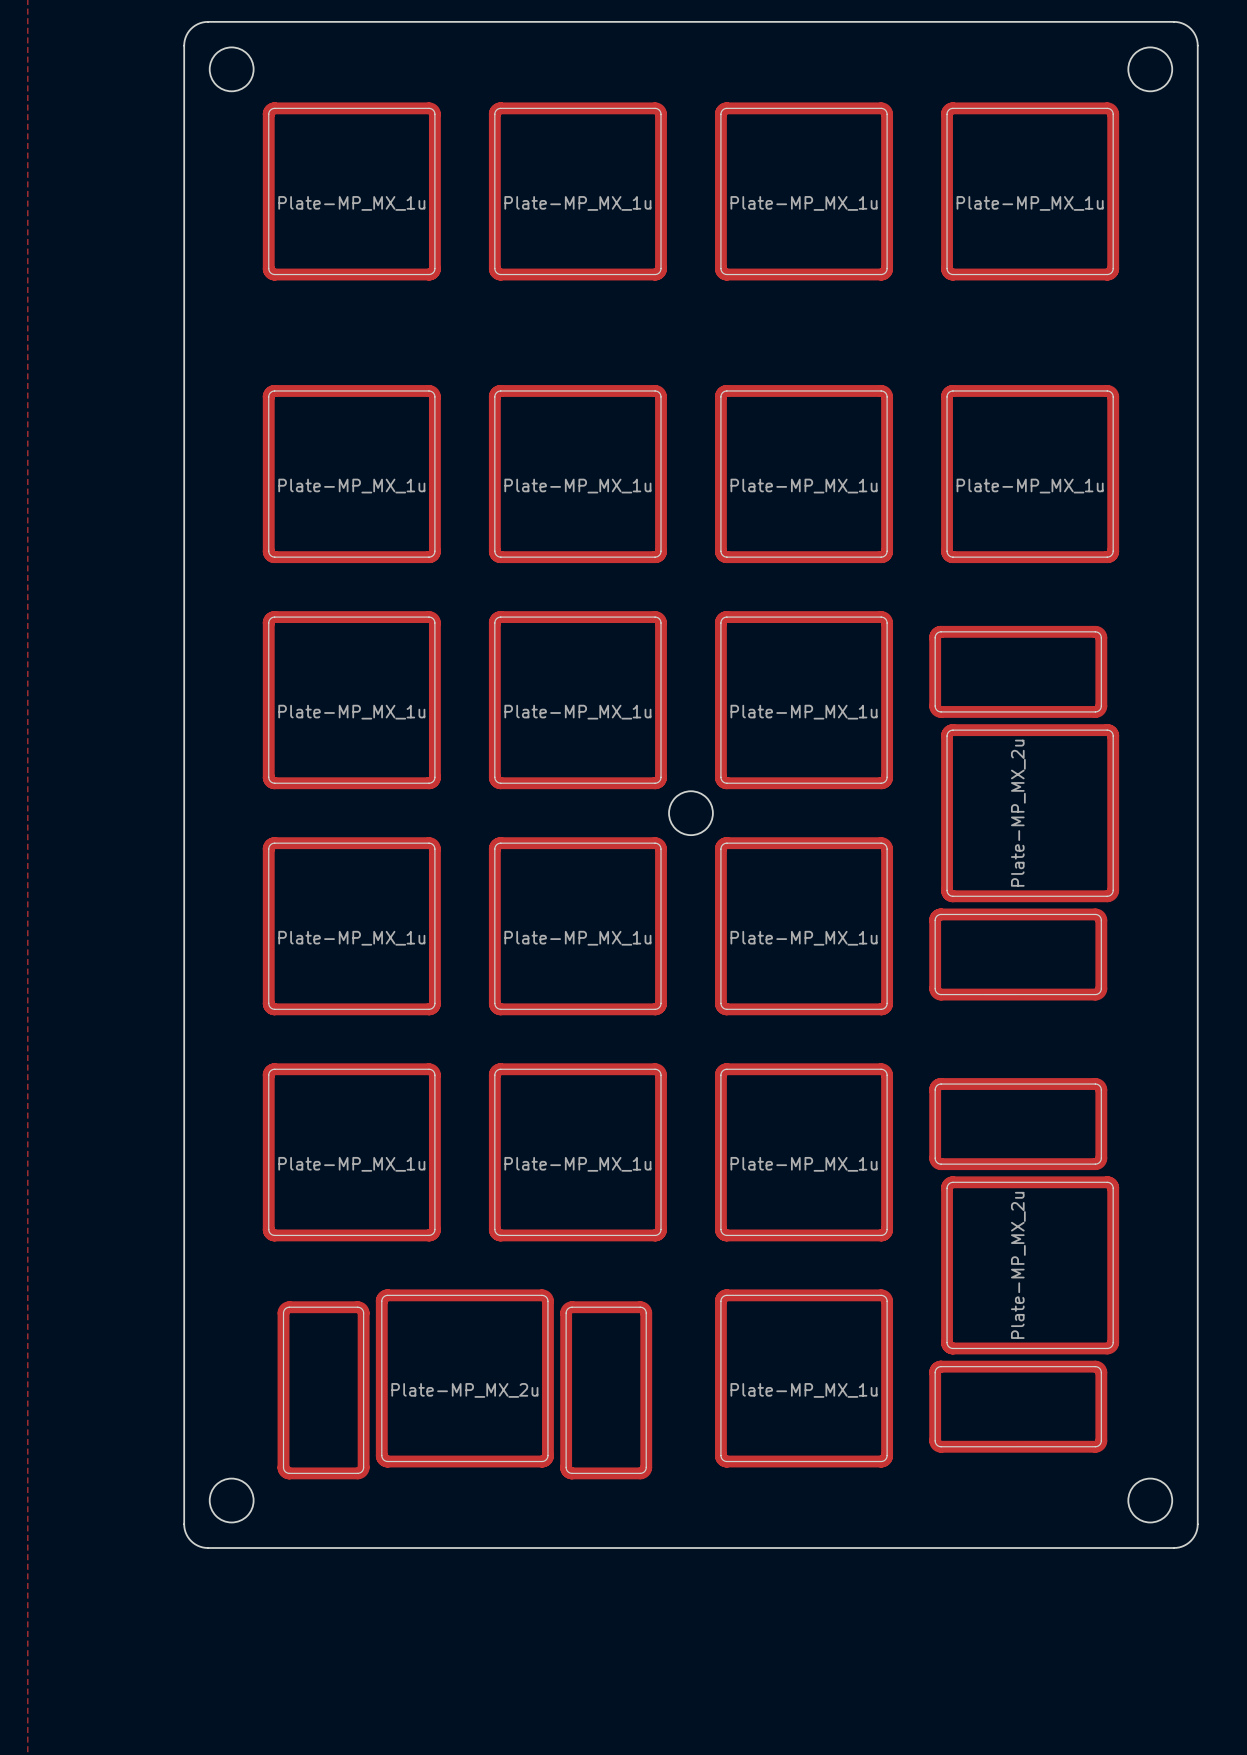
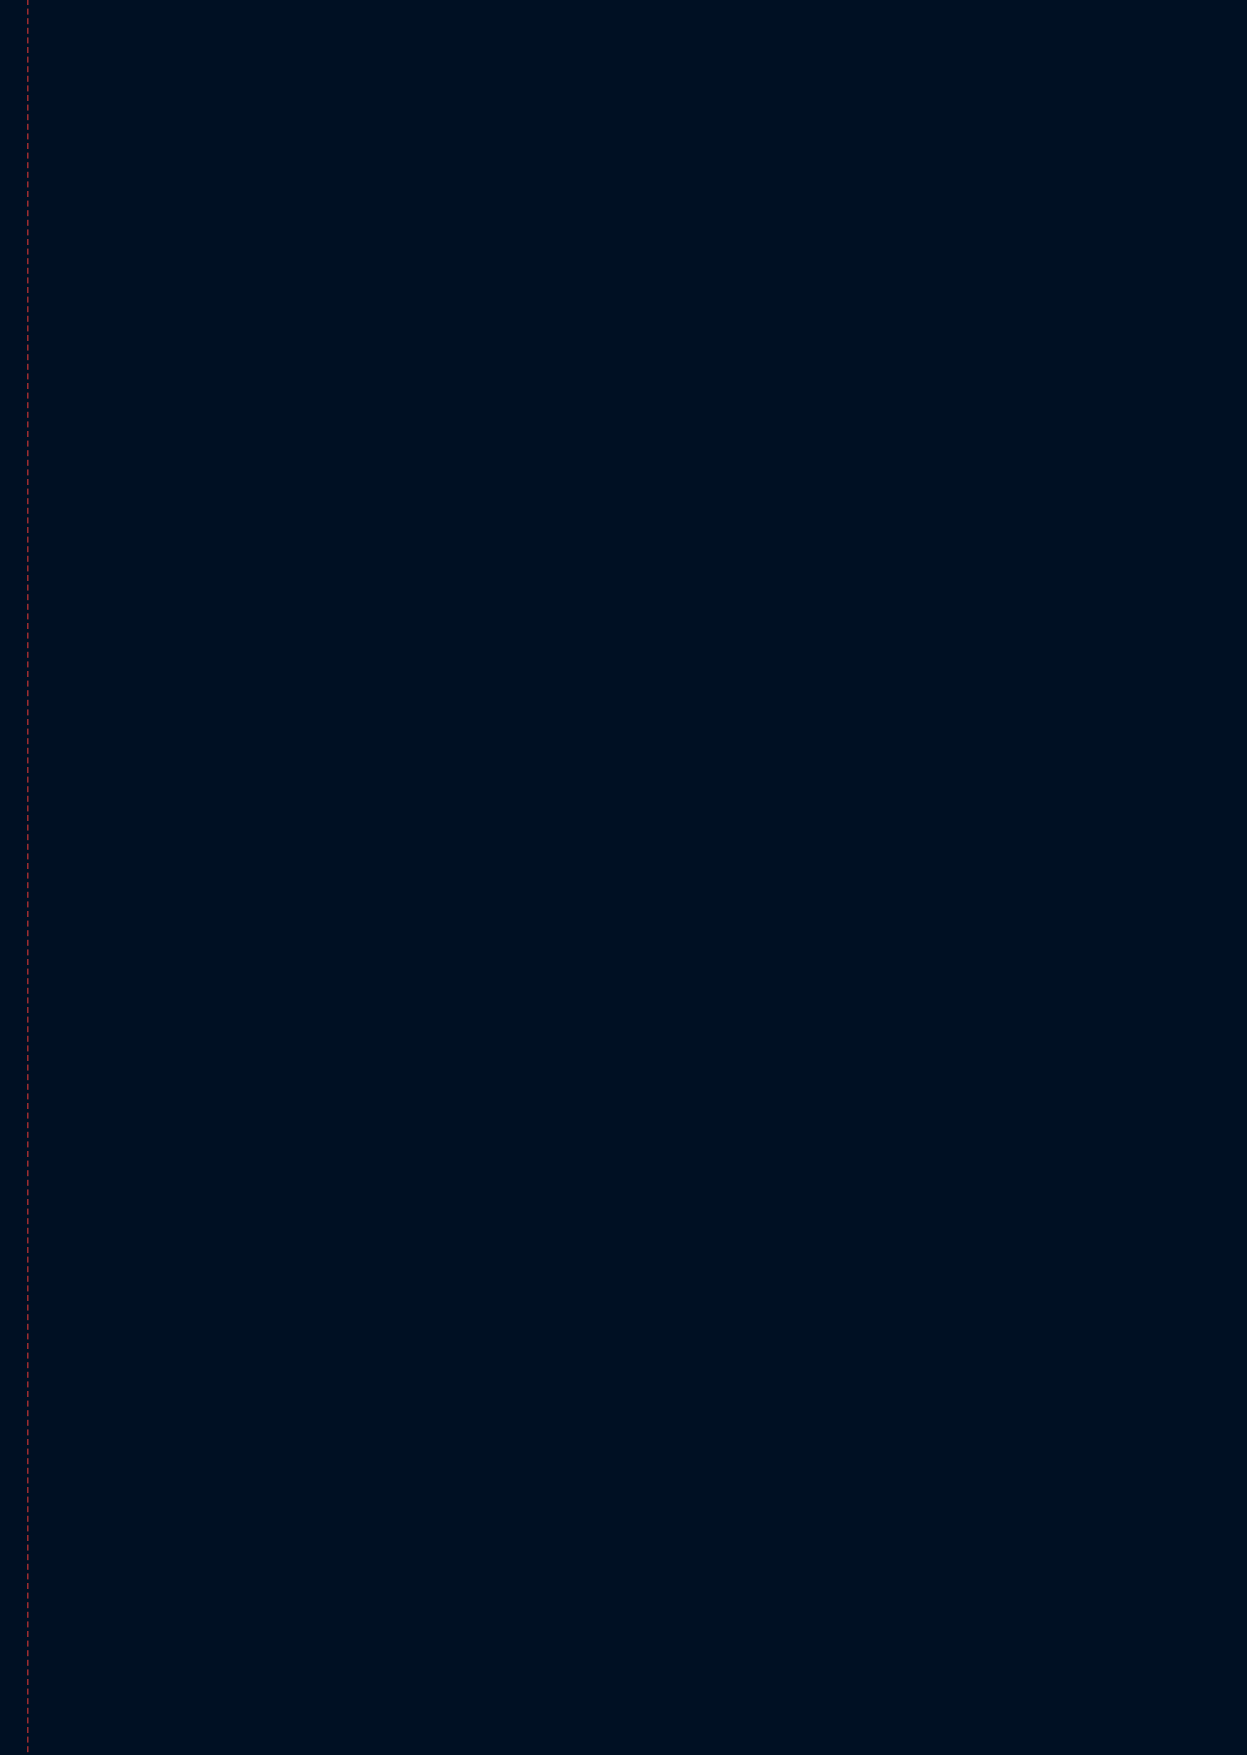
board edge: (207, 21) (1174, 21) (1186, 25) (1194, 32) (1197, 45) (1197, 1524) (1195, 1534) (1186, 1544) (1174, 1548) (207, 1548) (195, 1544) (187, 1536) (184, 1524) (184, 45) (186, 35) (191, 28) (200, 23) (207, 21) -> none
round board edge: [208, 46, 255, 93] -> none
round board edge: [1127, 46, 1174, 93] -> none
drawing: [262, 102, 441, 281] -> none
drawing: [488, 102, 667, 281] -> none
drawing: [715, 102, 894, 281] -> none
drawing: [941, 102, 1120, 281] -> none
drawing: [262, 385, 441, 564] -> none
drawing: [488, 385, 667, 564] -> none
drawing: [715, 385, 894, 564] -> none
drawing: [941, 385, 1120, 564] -> none
drawing: [262, 611, 441, 790] -> none
drawing: [488, 611, 667, 790] -> none
drawing: [715, 611, 894, 790] -> none
drawing: [929, 625, 1120, 1001] -> none
round board edge: [668, 790, 714, 837] -> none
drawing: [262, 837, 441, 1016] -> none
drawing: [488, 837, 667, 1016] -> none
drawing: [715, 837, 894, 1016] -> none
drawing: [262, 1063, 441, 1242] -> none
drawing: [488, 1063, 667, 1242] -> none
drawing: [715, 1063, 894, 1242] -> none
drawing: [929, 1078, 1120, 1453] -> none
drawing: [277, 1289, 653, 1480] -> none
drawing: [715, 1289, 894, 1468] -> none
round board edge: [208, 1477, 255, 1524] -> none
round board edge: [1127, 1477, 1174, 1524] -> none

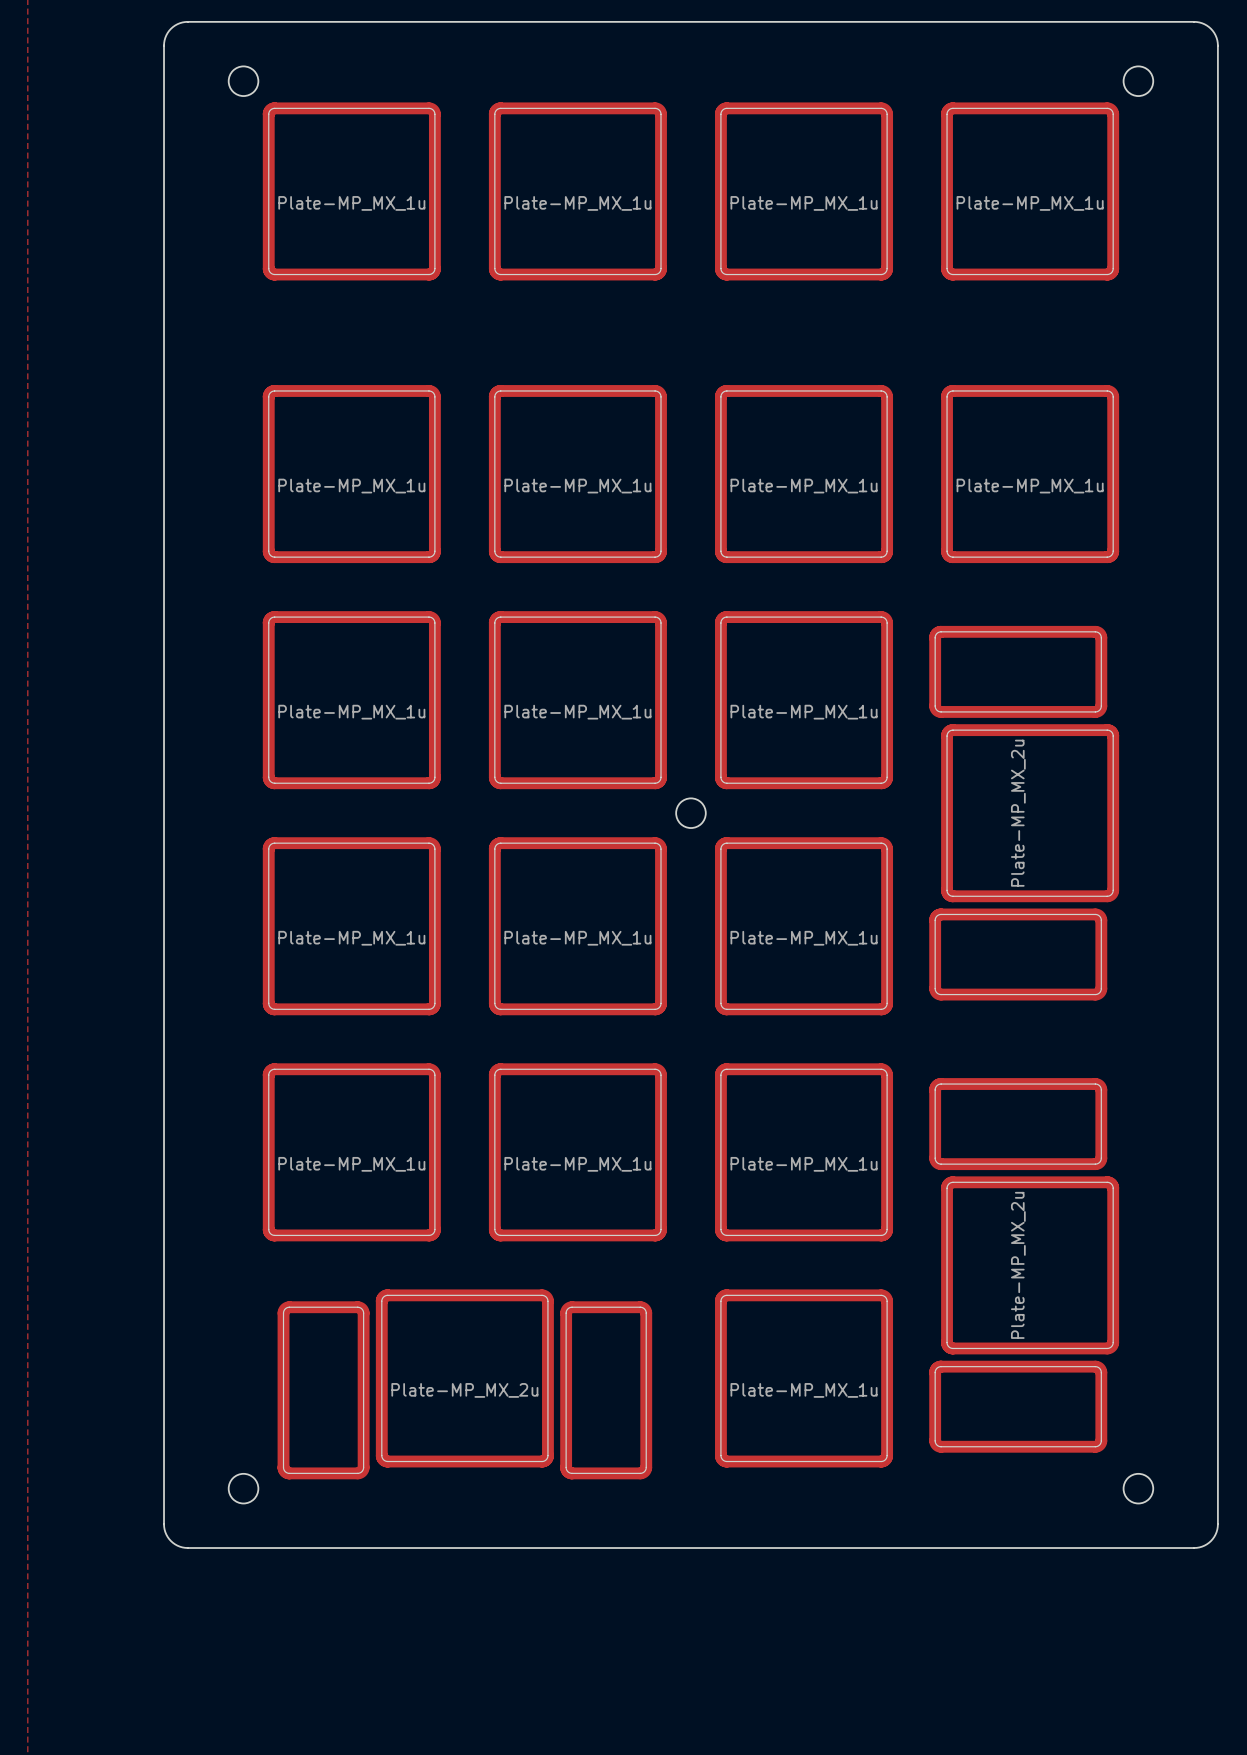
board edge: none -> (187, 21) (1194, 21) (1206, 25) (1214, 32) (1217, 45) (1217, 1524) (1215, 1534) (1206, 1544) (1194, 1548) (187, 1548) (175, 1544) (167, 1536) (164, 1524) (164, 45) (165, 37) (170, 28) (179, 23) (187, 21)
round board edge: none -> [227, 65, 260, 97]
round board edge: none -> [1122, 65, 1155, 97]
drawing: none -> [262, 102, 441, 281]
drawing: none -> [488, 102, 667, 281]
drawing: none -> [715, 102, 894, 281]
drawing: none -> [941, 102, 1120, 281]
drawing: none -> [262, 385, 441, 564]
drawing: none -> [488, 385, 667, 564]
drawing: none -> [715, 385, 894, 564]
drawing: none -> [941, 385, 1120, 564]
drawing: none -> [262, 611, 441, 790]
drawing: none -> [488, 611, 667, 790]
drawing: none -> [715, 611, 894, 790]
drawing: none -> [929, 625, 1120, 1001]
round board edge: none -> [675, 797, 707, 829]
drawing: none -> [262, 837, 441, 1016]
drawing: none -> [488, 837, 667, 1016]
drawing: none -> [715, 837, 894, 1016]
drawing: none -> [262, 1063, 441, 1242]
drawing: none -> [488, 1063, 667, 1242]
drawing: none -> [715, 1063, 894, 1242]
drawing: none -> [929, 1078, 1120, 1453]
drawing: none -> [277, 1289, 653, 1480]
drawing: none -> [715, 1289, 894, 1468]
round board edge: none -> [227, 1472, 260, 1505]
round board edge: none -> [1122, 1472, 1155, 1505]

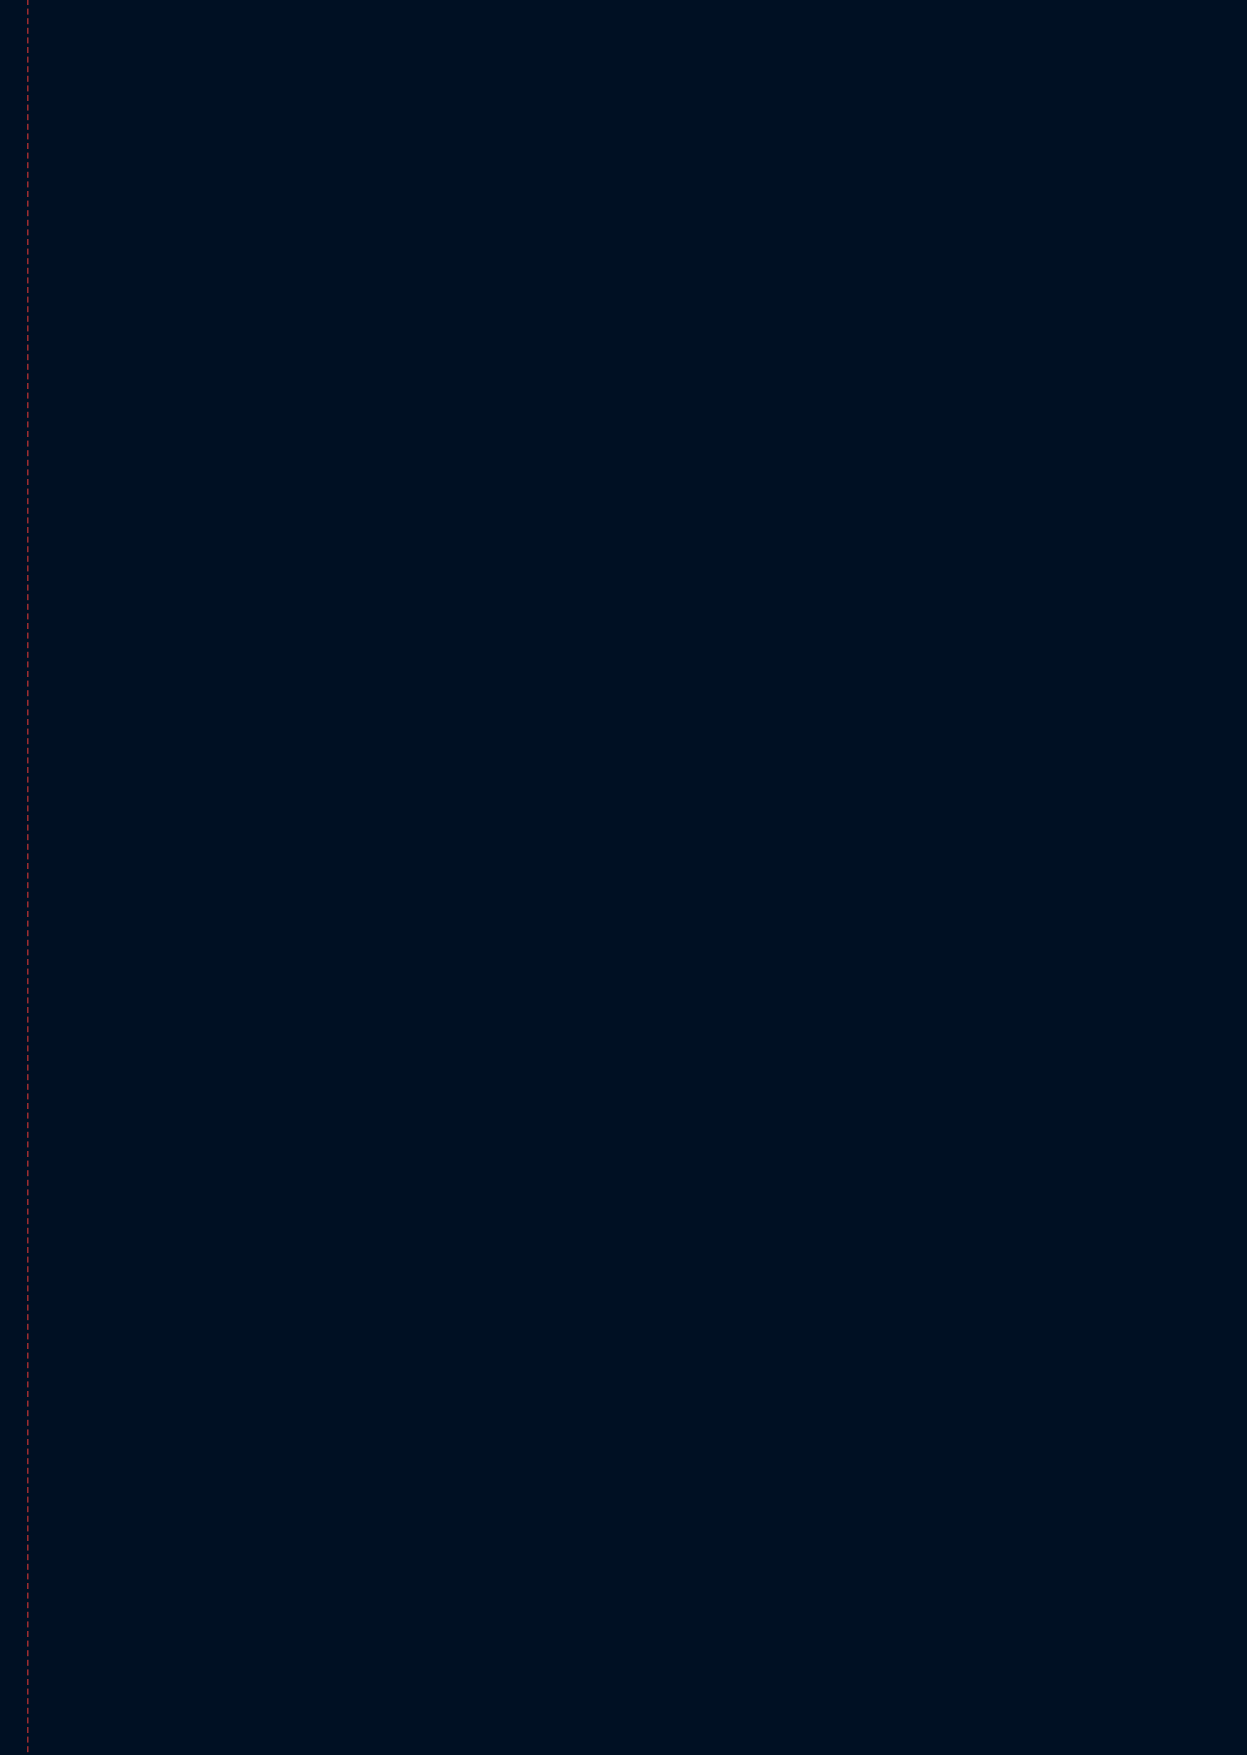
board edge: (187, 21) (1194, 21) (1206, 25) (1214, 32) (1217, 45) (1217, 1524) (1215, 1534) (1206, 1544) (1194, 1548) (187, 1548) (175, 1544) (167, 1536) (164, 1524) (164, 45) (165, 37) (170, 28) (179, 23) (187, 21) -> none
round board edge: [227, 65, 260, 97] -> none
round board edge: [1122, 65, 1155, 97] -> none
drawing: [262, 102, 441, 281] -> none
drawing: [488, 102, 667, 281] -> none
drawing: [715, 102, 894, 281] -> none
drawing: [941, 102, 1120, 281] -> none
drawing: [262, 385, 441, 564] -> none
drawing: [488, 385, 667, 564] -> none
drawing: [715, 385, 894, 564] -> none
drawing: [941, 385, 1120, 564] -> none
drawing: [262, 611, 441, 790] -> none
drawing: [488, 611, 667, 790] -> none
drawing: [715, 611, 894, 790] -> none
drawing: [929, 625, 1120, 1001] -> none
round board edge: [675, 797, 707, 829] -> none
drawing: [262, 837, 441, 1016] -> none
drawing: [488, 837, 667, 1016] -> none
drawing: [715, 837, 894, 1016] -> none
drawing: [262, 1063, 441, 1242] -> none
drawing: [488, 1063, 667, 1242] -> none
drawing: [715, 1063, 894, 1242] -> none
drawing: [929, 1078, 1120, 1453] -> none
drawing: [277, 1289, 653, 1480] -> none
drawing: [715, 1289, 894, 1468] -> none
round board edge: [227, 1472, 260, 1505] -> none
round board edge: [1122, 1472, 1155, 1505] -> none

